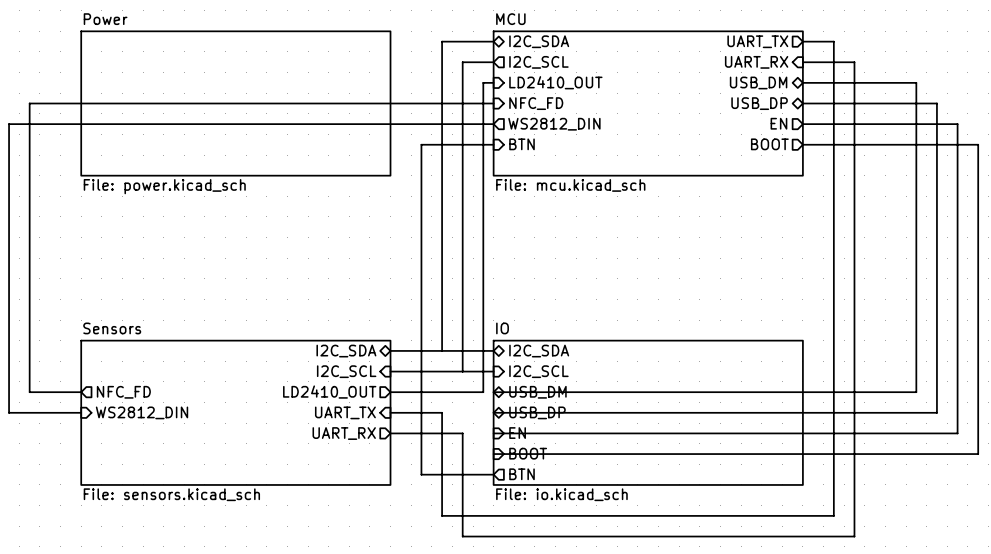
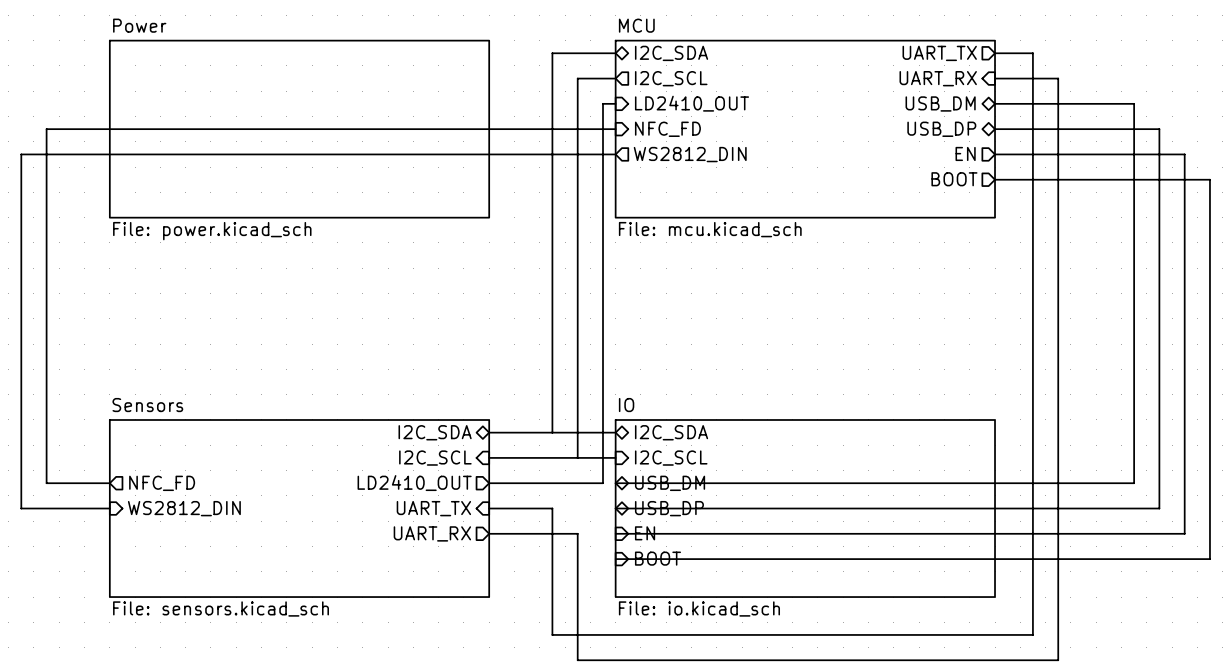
wire: (493, 144) (421, 144) (421, 474) (493, 474) -> none
sheet pin: BTN (522, 144) -> none
sheet pin: BTN (522, 474) -> none

